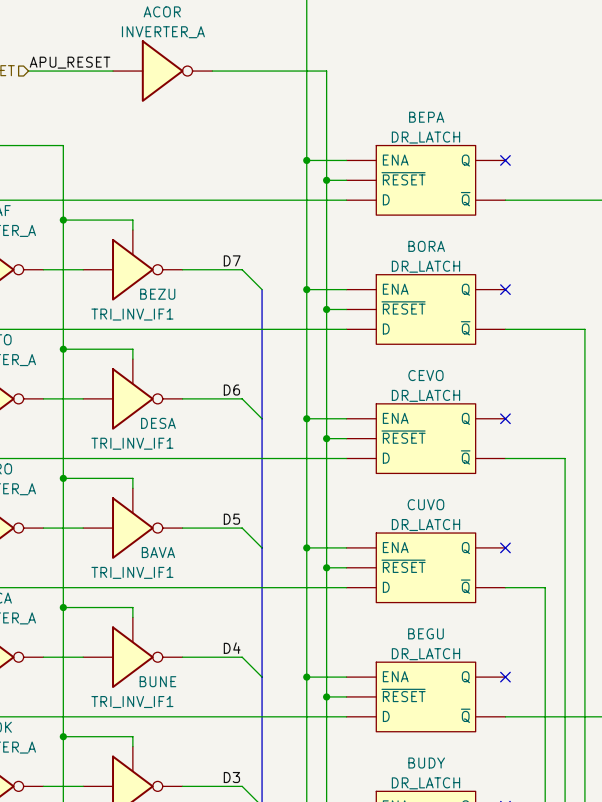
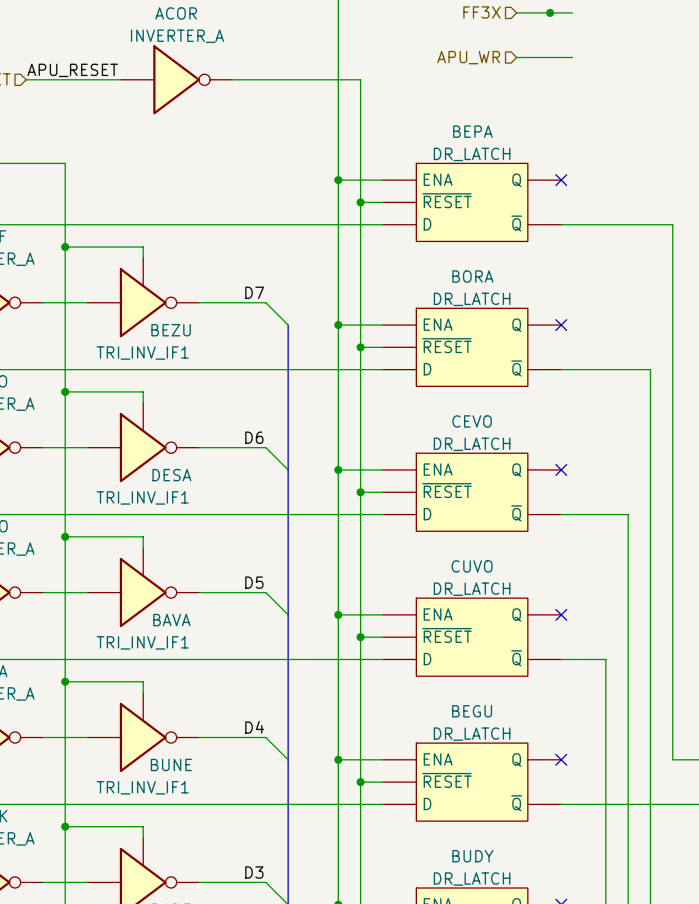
hierarchical label: none -> FF3X (481, 12)
wire: none -> (516, 12) (572, 12)
junction: none -> (550, 12)
hierarchical label: none -> APU_WR (468, 57)
wire: none -> (516, 57) (572, 57)

